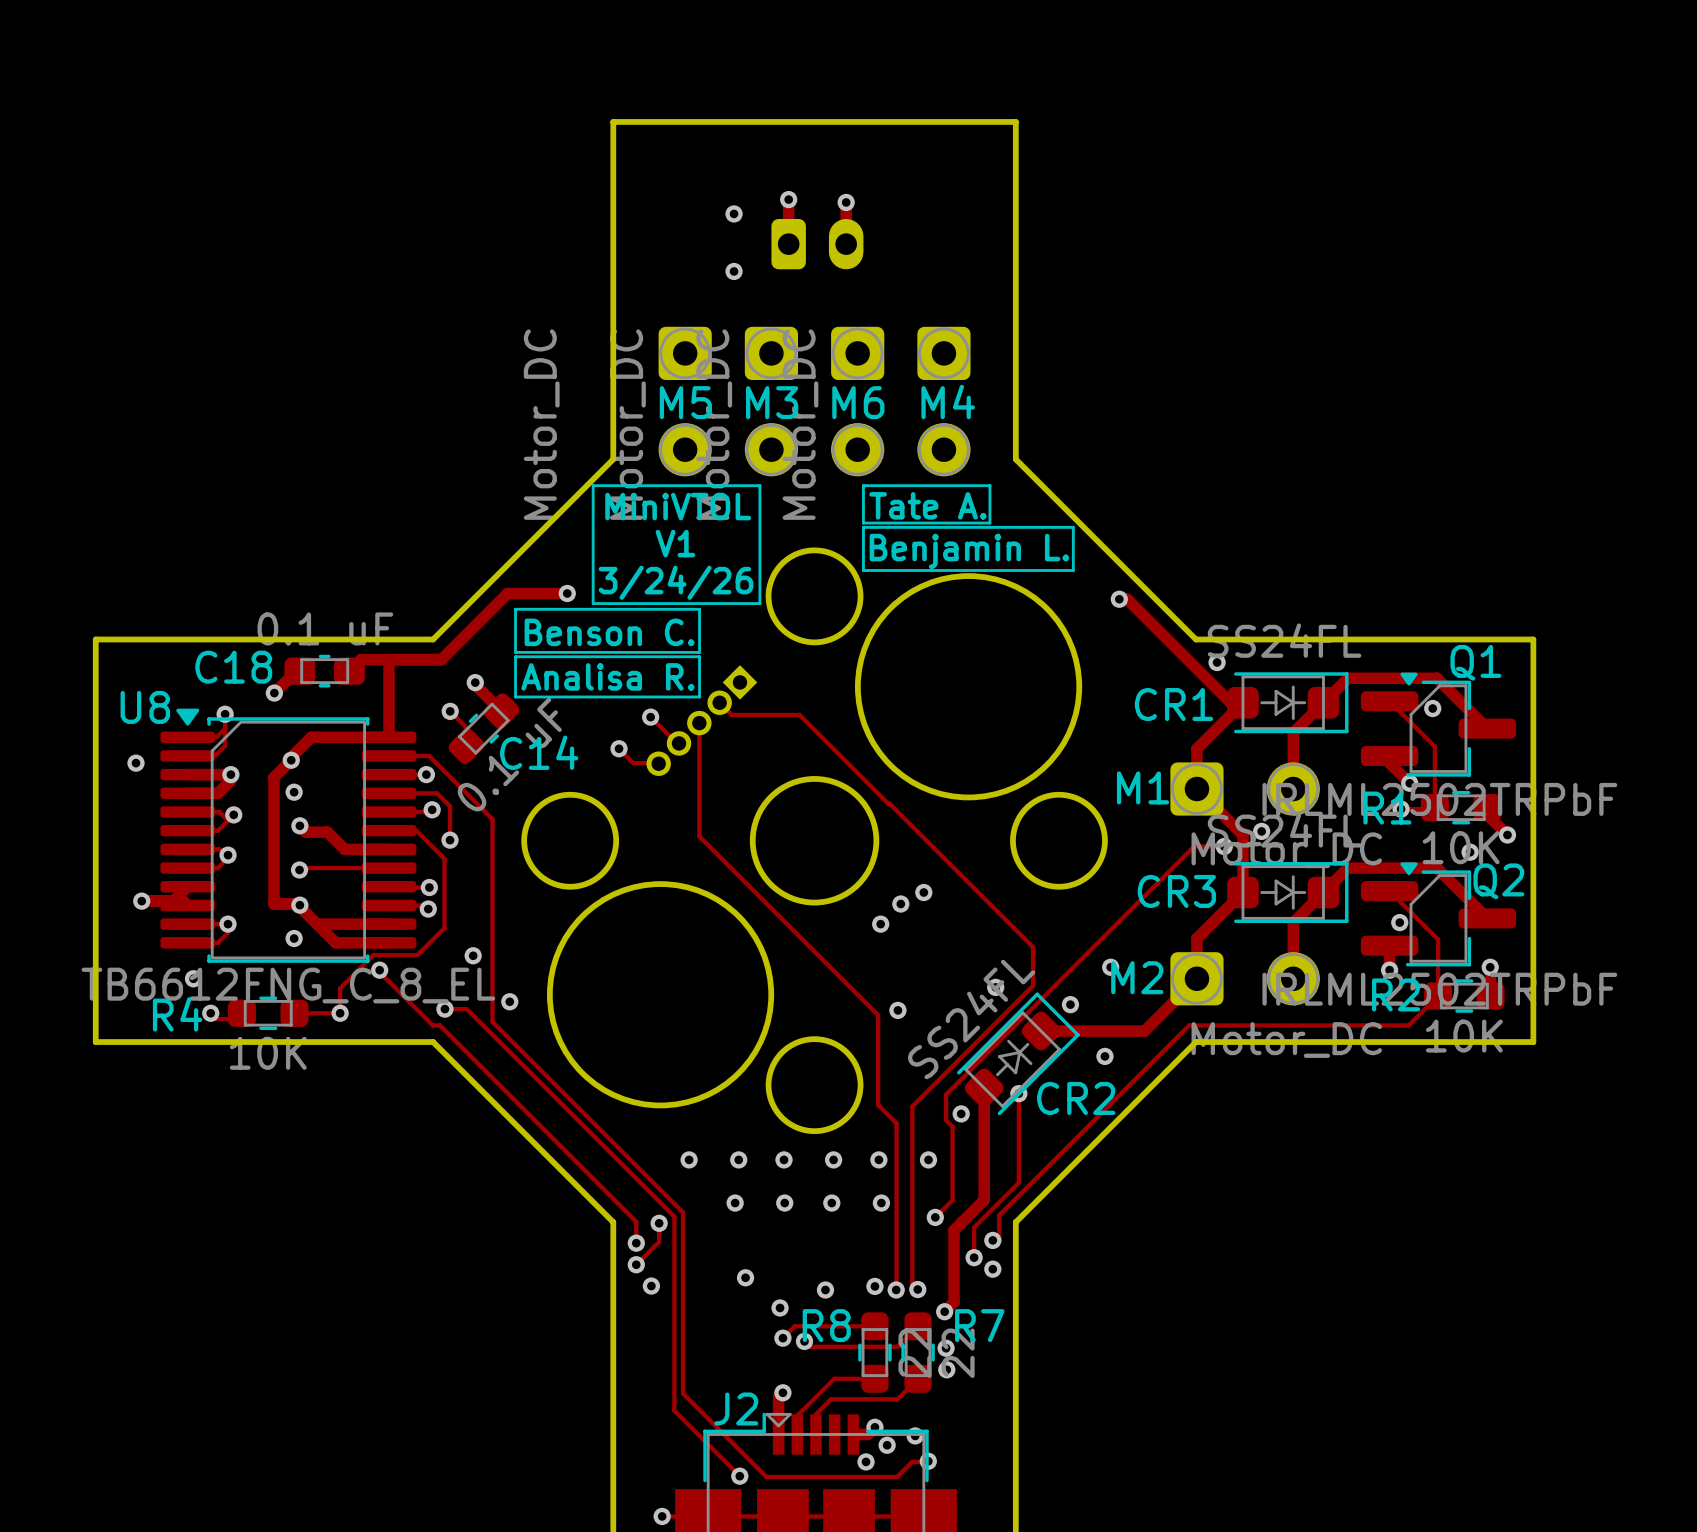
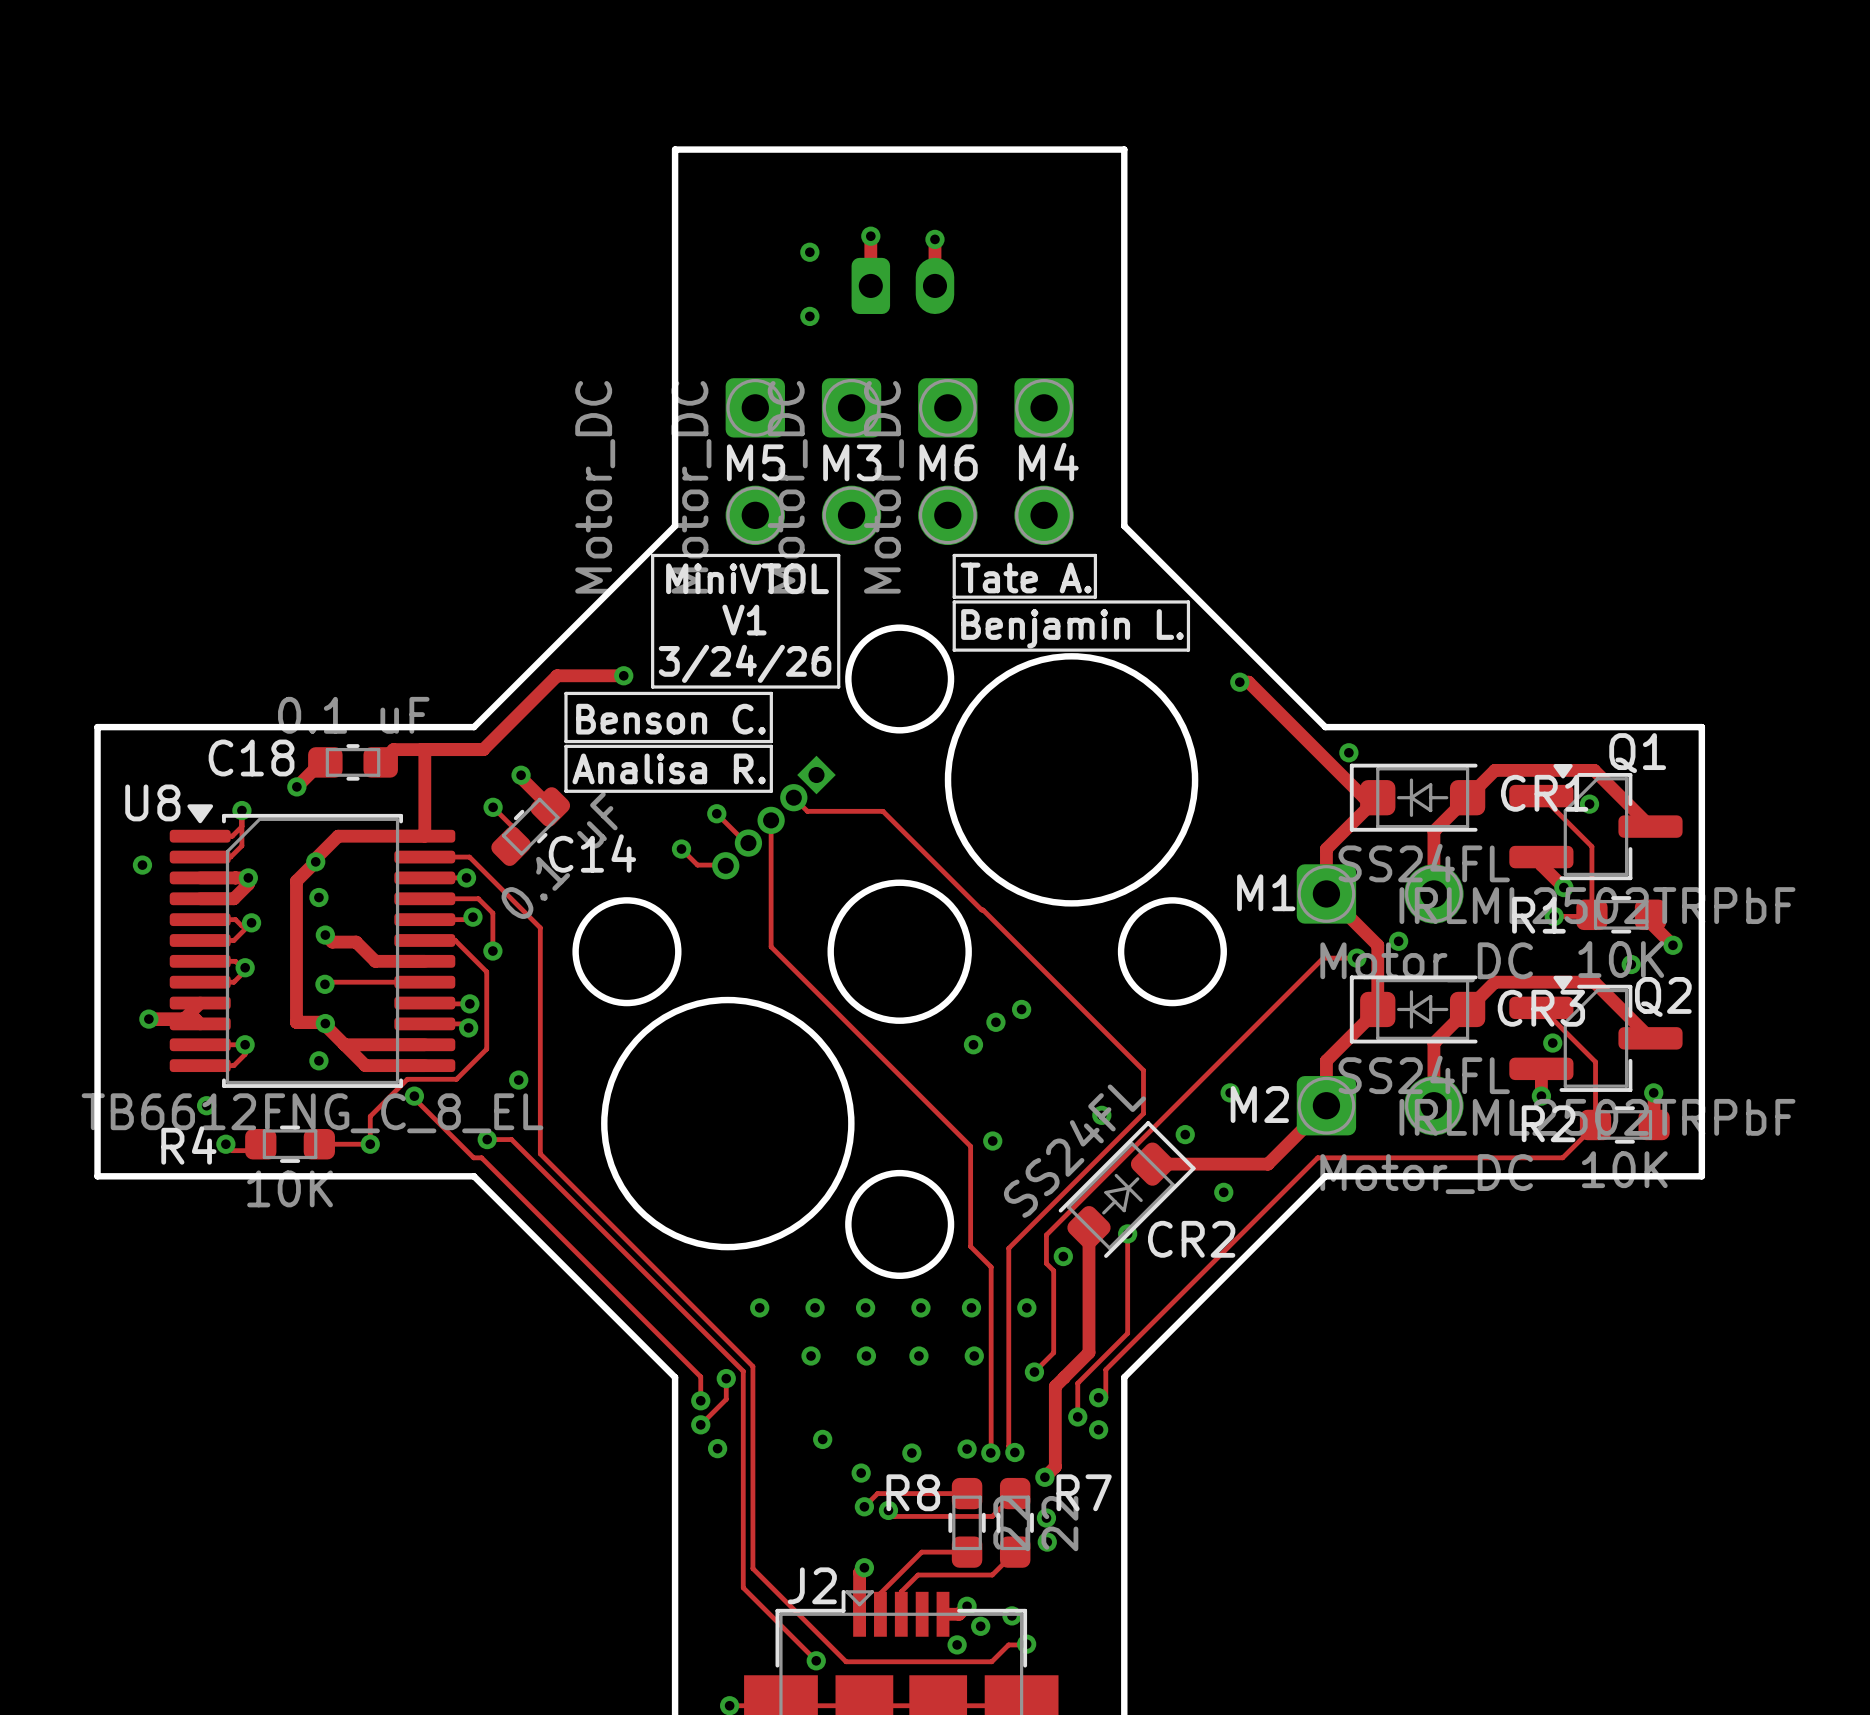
CR1 rotation: 0° (1287, 702) -> 180° (1417, 797)
CR3 rotation: 0° (1287, 892) -> 180° (1417, 1009)
via: (509, 1001) -> none

